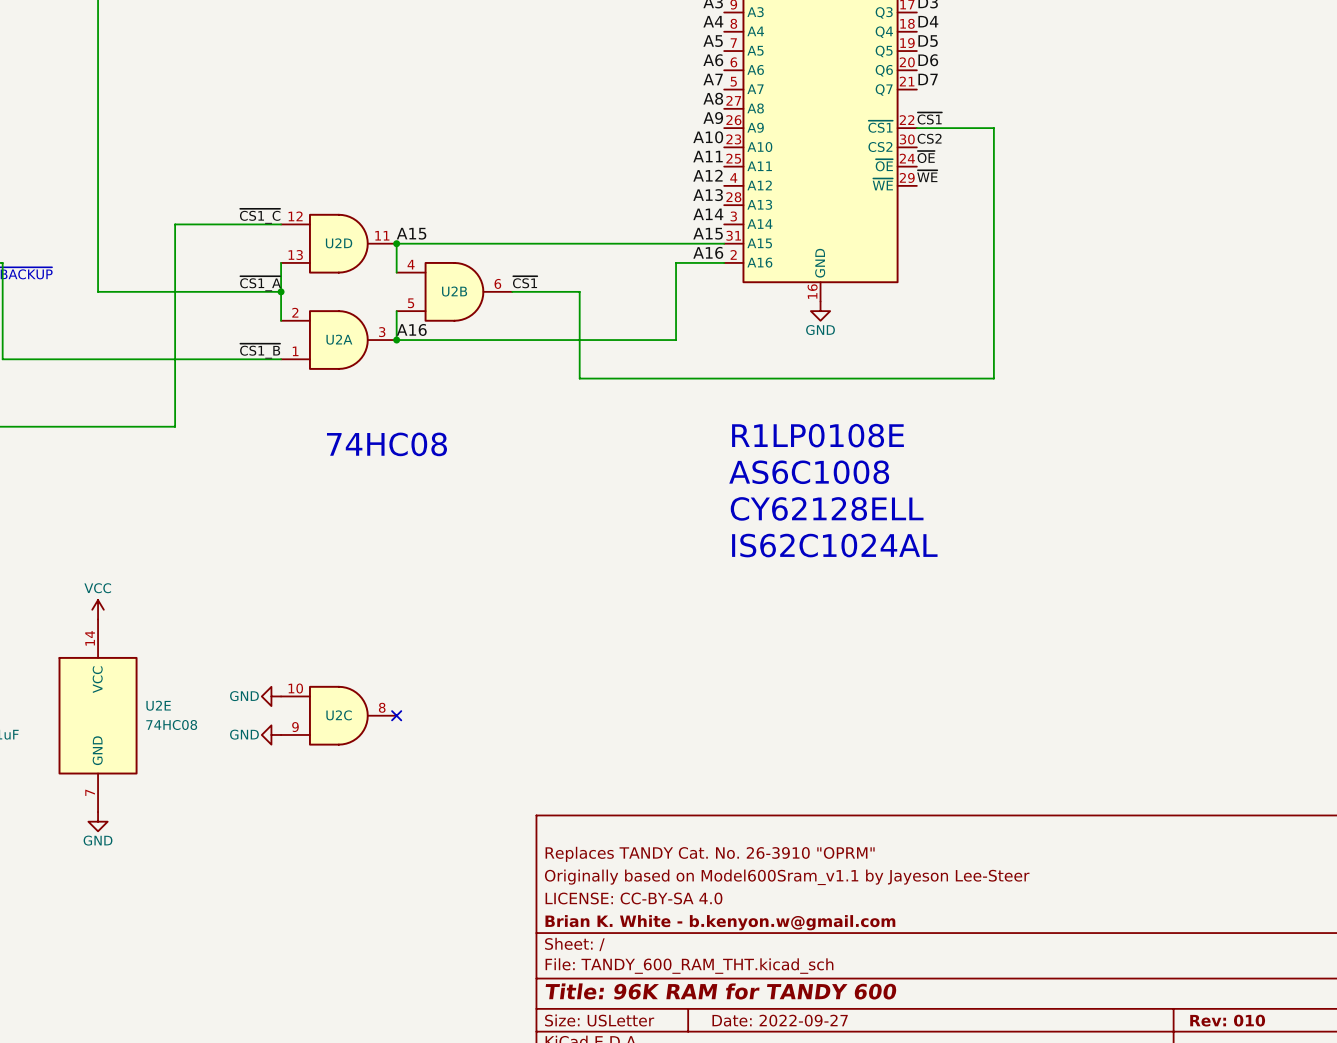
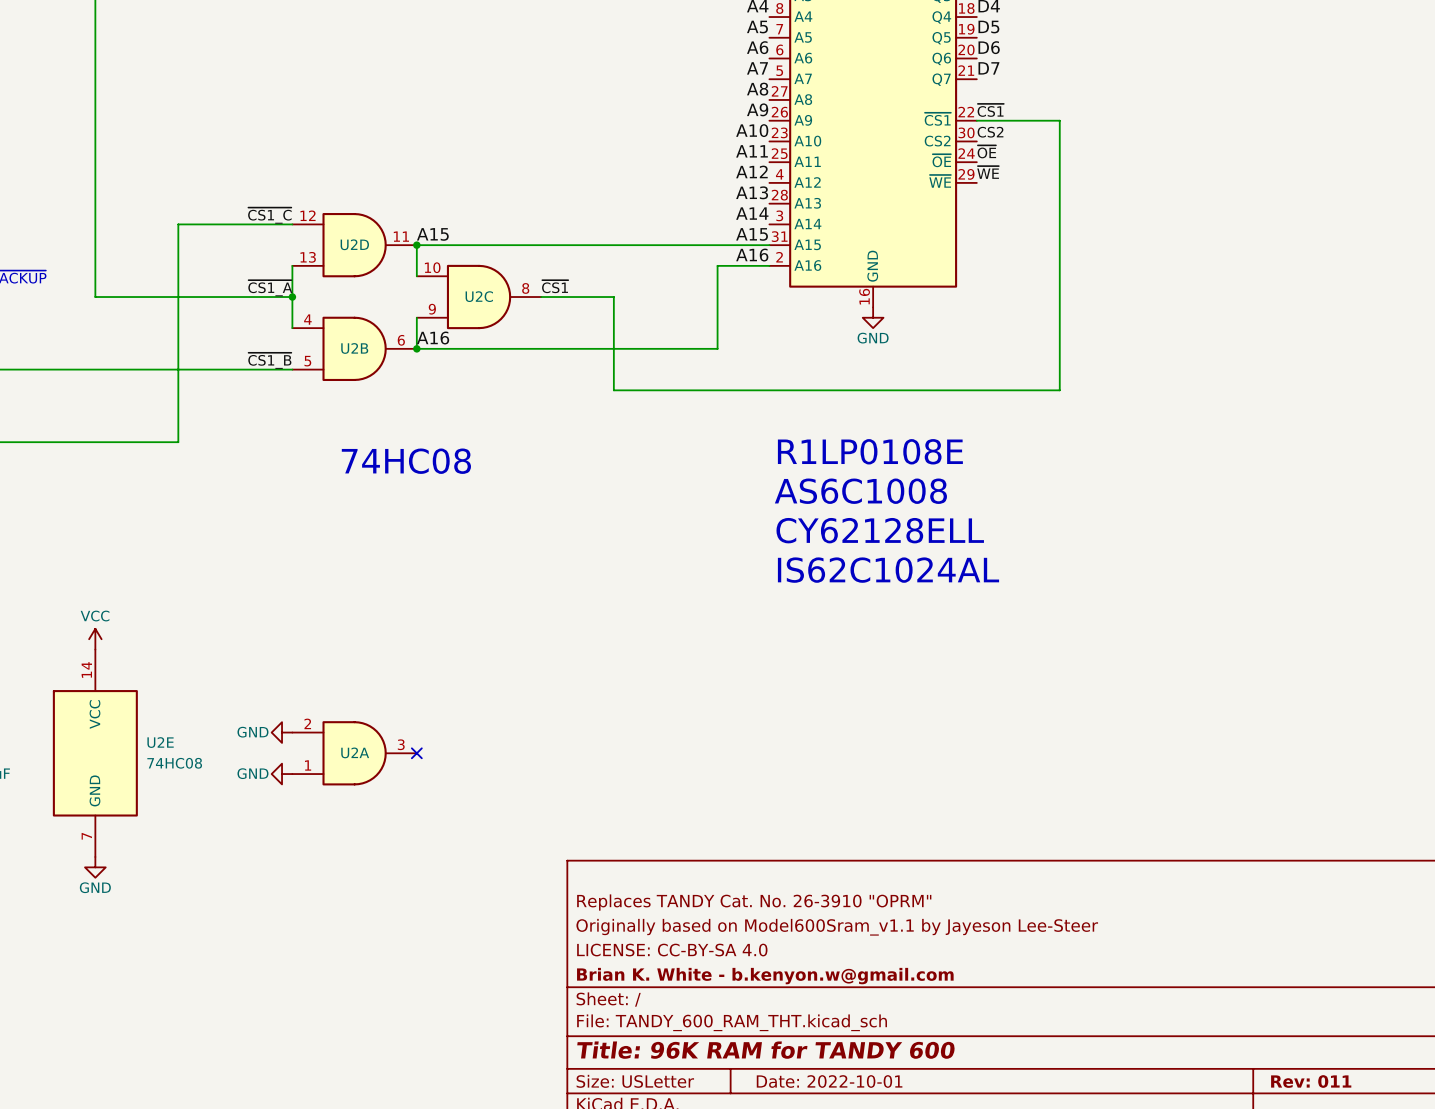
U2B position: (454, 291) -> (354, 348)
U2A position: (338, 340) -> (354, 753)
U2C position: (338, 715) -> (479, 297)
title block: Date: 2022-09-27 (780, 1020) -> Date: 2022-10-01 (829, 1081)
title block: Rev: 010 (1227, 1020) -> Rev: 011 (1311, 1081)

